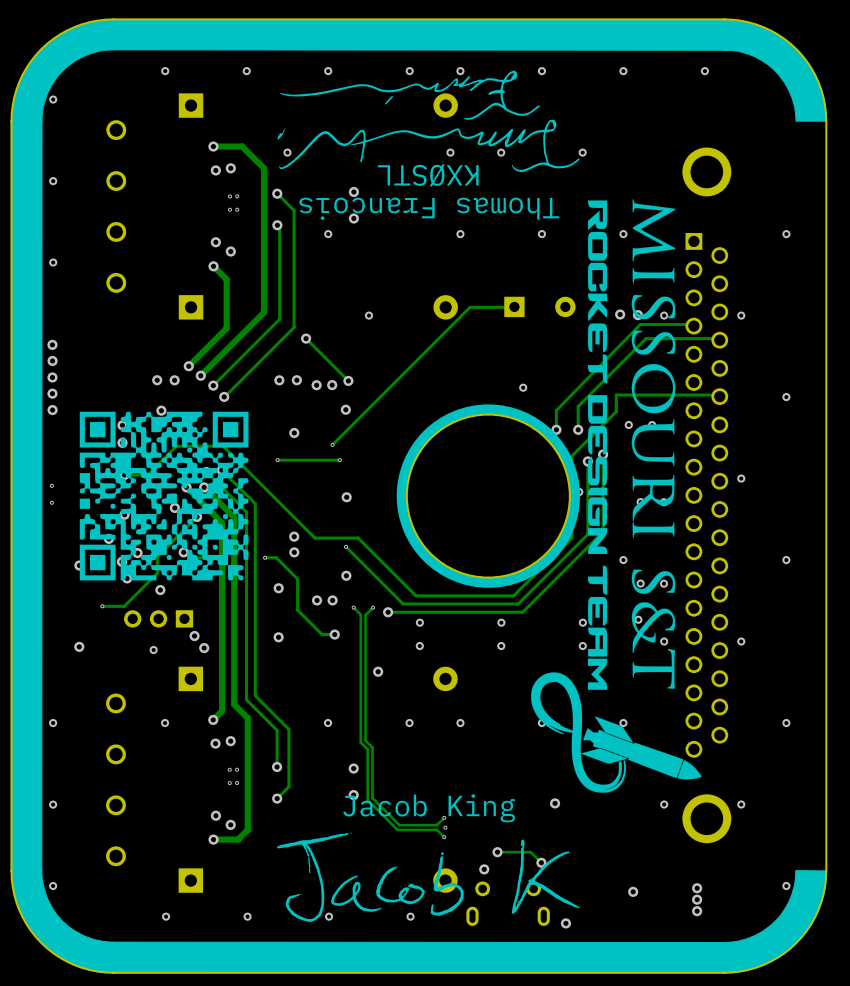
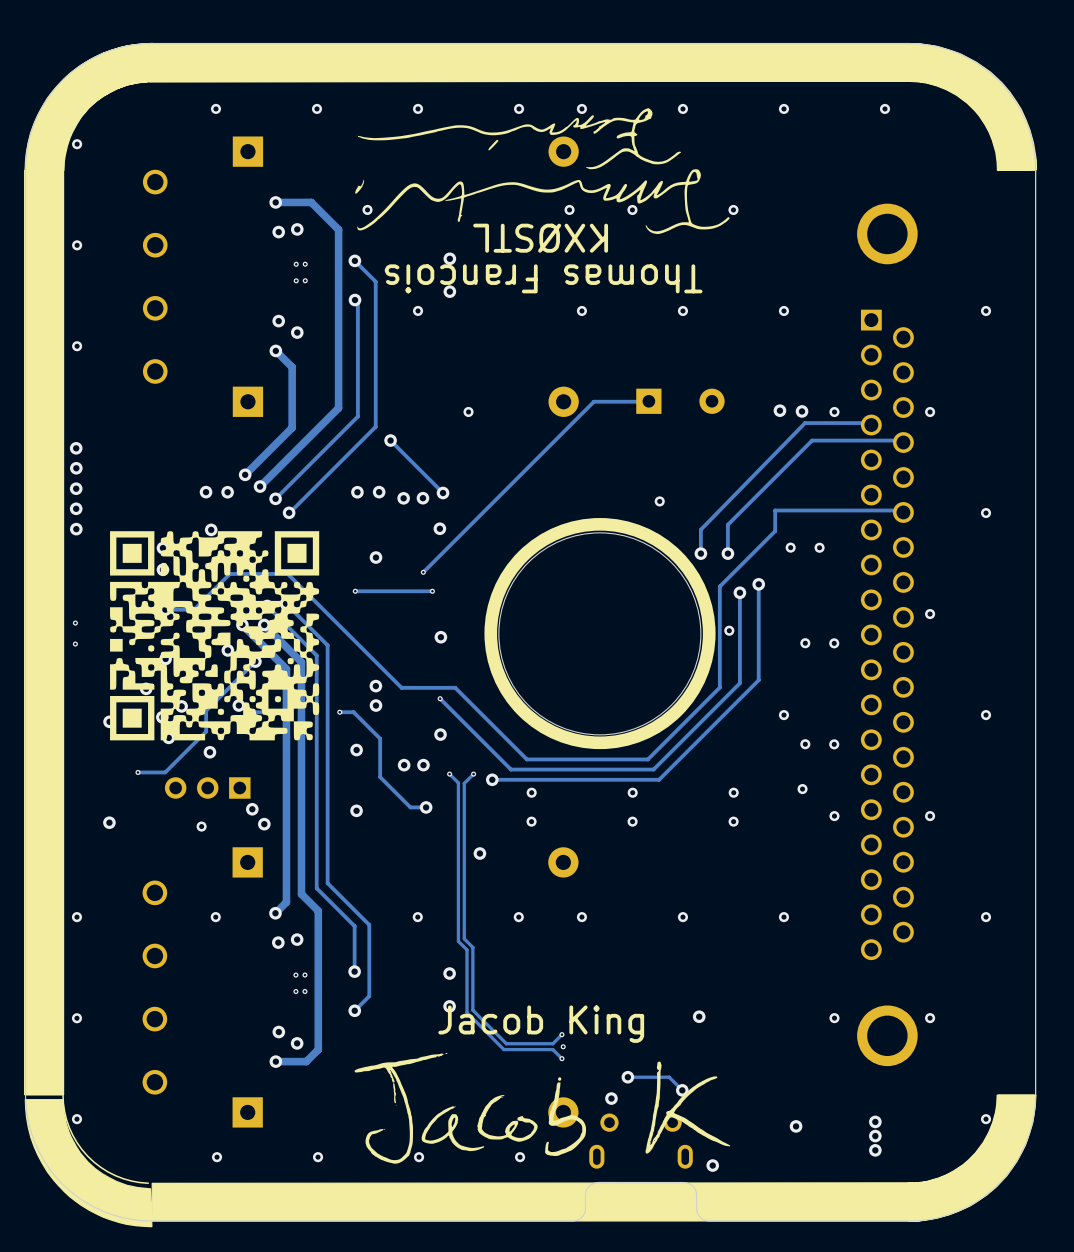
drawing: none -> [23, 42, 1038, 1096]
drawing: [10, 19, 827, 871] -> none
board edge: (724, 19) (105, 19) (81, 24) (67, 30) (47, 43) (30, 61) (16, 89) (11, 121) (11, 870) (14, 894) (22, 917) (35, 937) (53, 953) (81, 967) (113, 972) (724, 972) (748, 969) (770, 961) (790, 948) (806, 930) (821, 902) (826, 870) (826, 113) (823, 97) (815, 75) (806, 61) (790, 43) (770, 30) (755, 24) (724, 19) -> (909, 43) (938, 47) (957, 53) (975, 62) (998, 80) (1011, 95) (1021, 112) (1032, 140) (1035, 159) (1035, 1094) (1034, 1114) (1029, 1133) (1021, 1152) (1011, 1168) (991, 1190) (966, 1207) (938, 1217) (909, 1221) (706, 1220) (701, 1218) (697, 1212) (694, 1188) (689, 1183) (683, 1182) (593, 1183) (586, 1190) (583, 1215) (579, 1219) (572, 1221) (141, 1220) (112, 1214) (94, 1207) (77, 1196) (55, 1176) (39, 1152) (28, 1124) (25, 1094) (25, 169) (27, 150) (31, 130) (39, 112) (49, 95) (69, 73) (94, 57) (122, 47) (141, 43) (909, 43)
drawing: [396, 199, 702, 793] -> none
drawing: none -> [484, 518, 716, 750]
round board edge position: (488, 496) -> (599, 633)
line: none -> (63, 1094) (64, 1111) (69, 1128) (77, 1143) (87, 1156) (100, 1167) (115, 1175) (131, 1181) (148, 1183)
drawing: none -> [907, 1094, 1037, 1222]
drawing: [724, 870, 827, 974] -> none
drawing shape: [111, 941, 726, 974] -> [151, 1182, 914, 1222]

